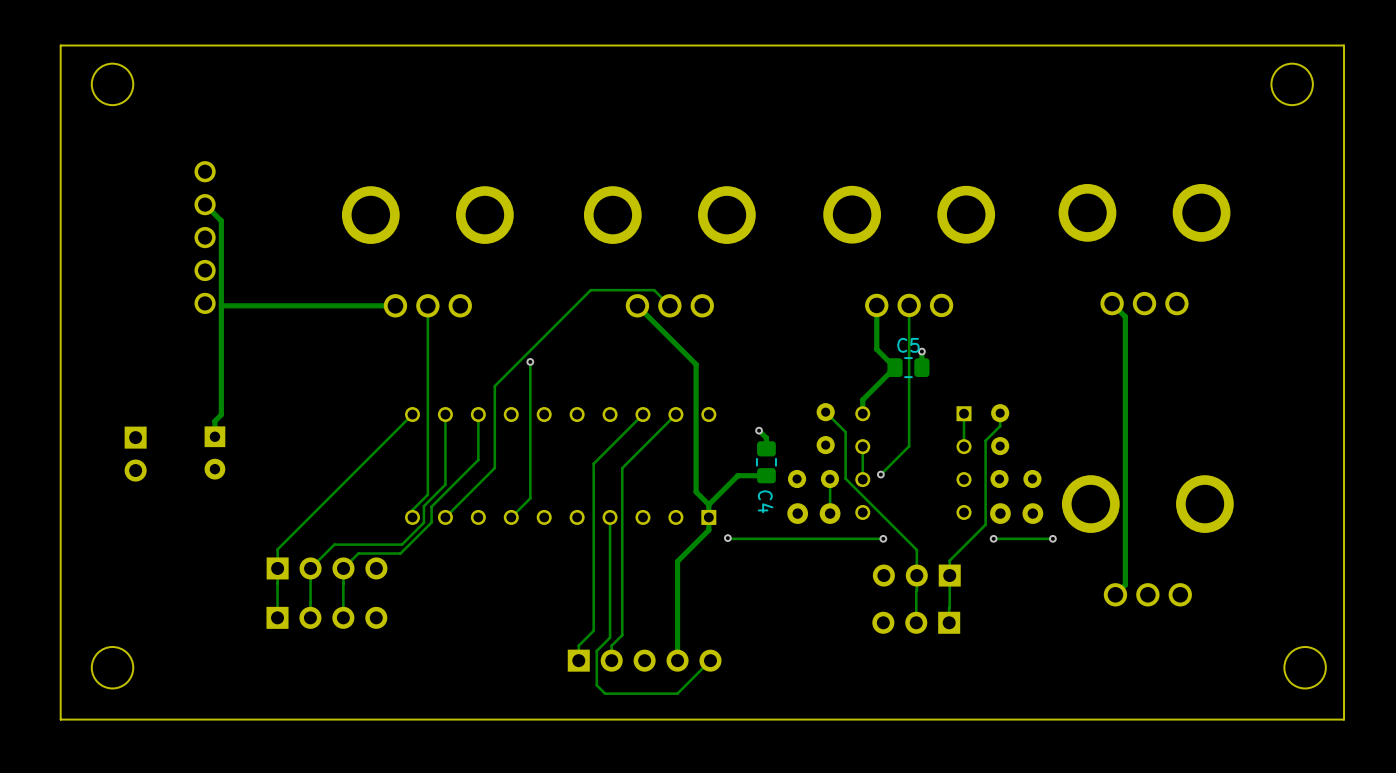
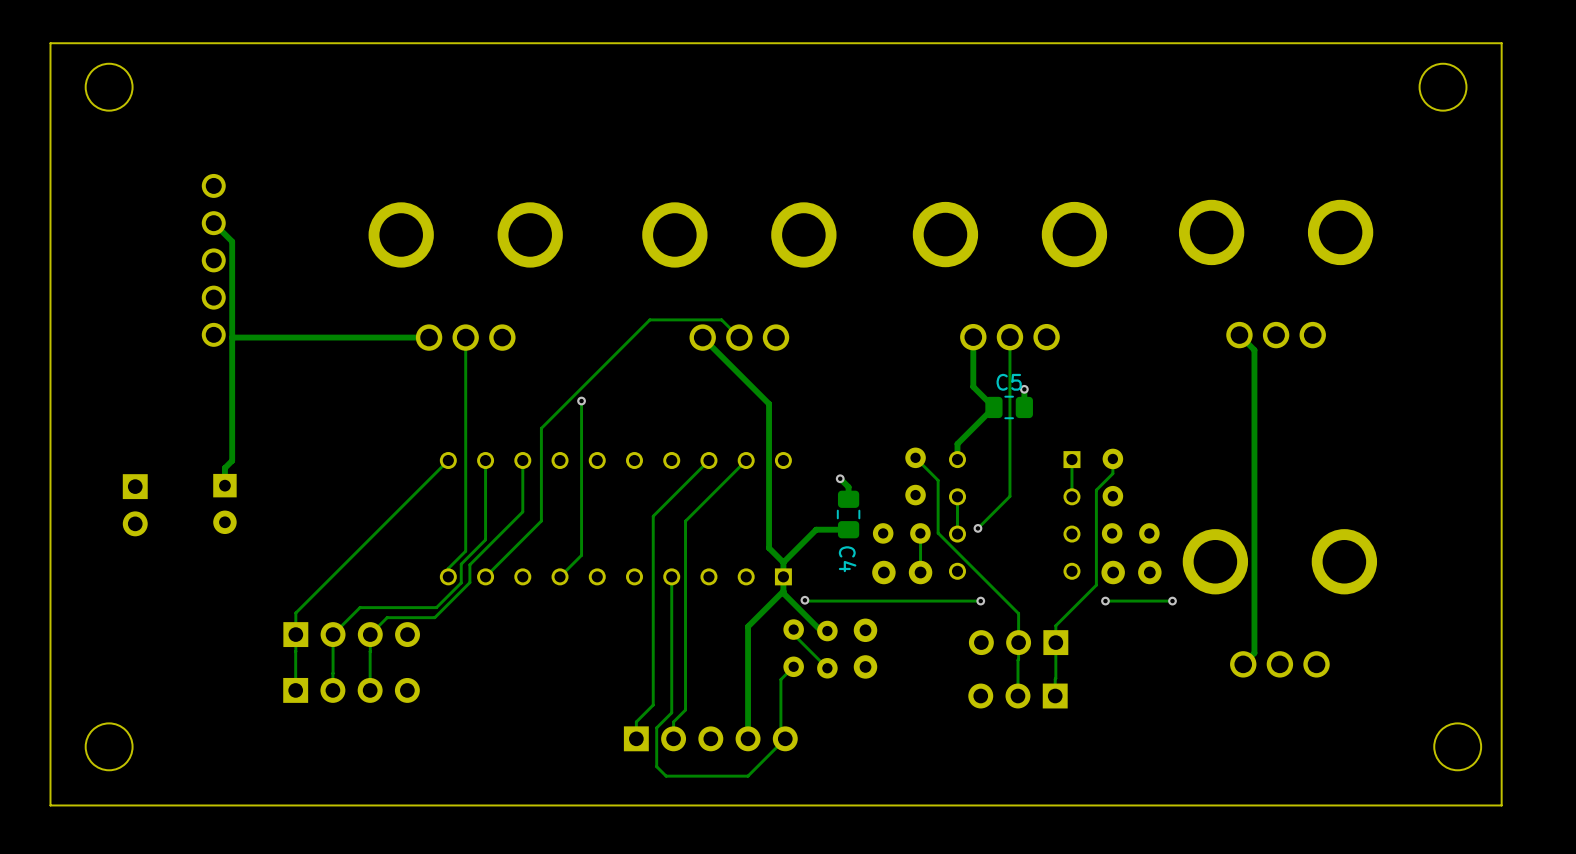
track: none -> (783, 591) (821, 631) (827, 631)
track: none -> (793, 629) (793, 634) (827, 668)
part: none -> (793, 648)
part: none -> (865, 648)
part: none -> (827, 649)
track: none -> (793, 666) (780, 679) (780, 743)

